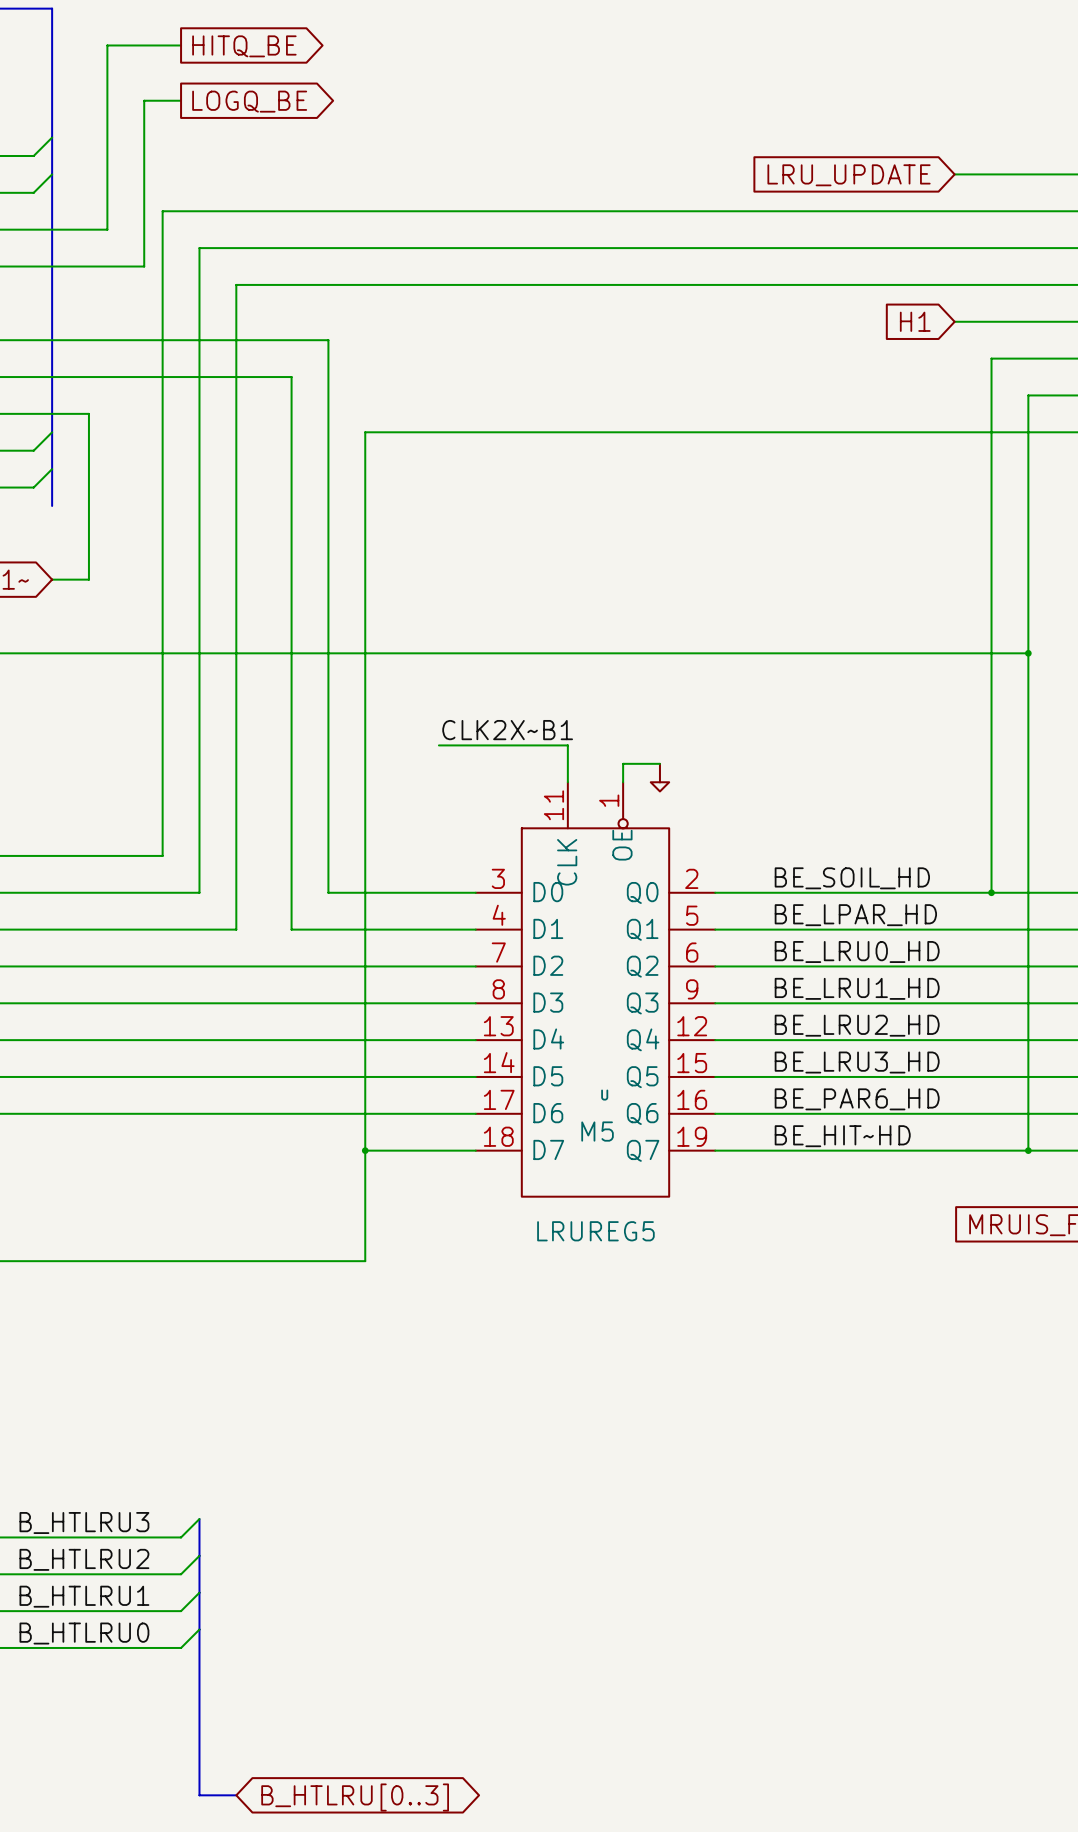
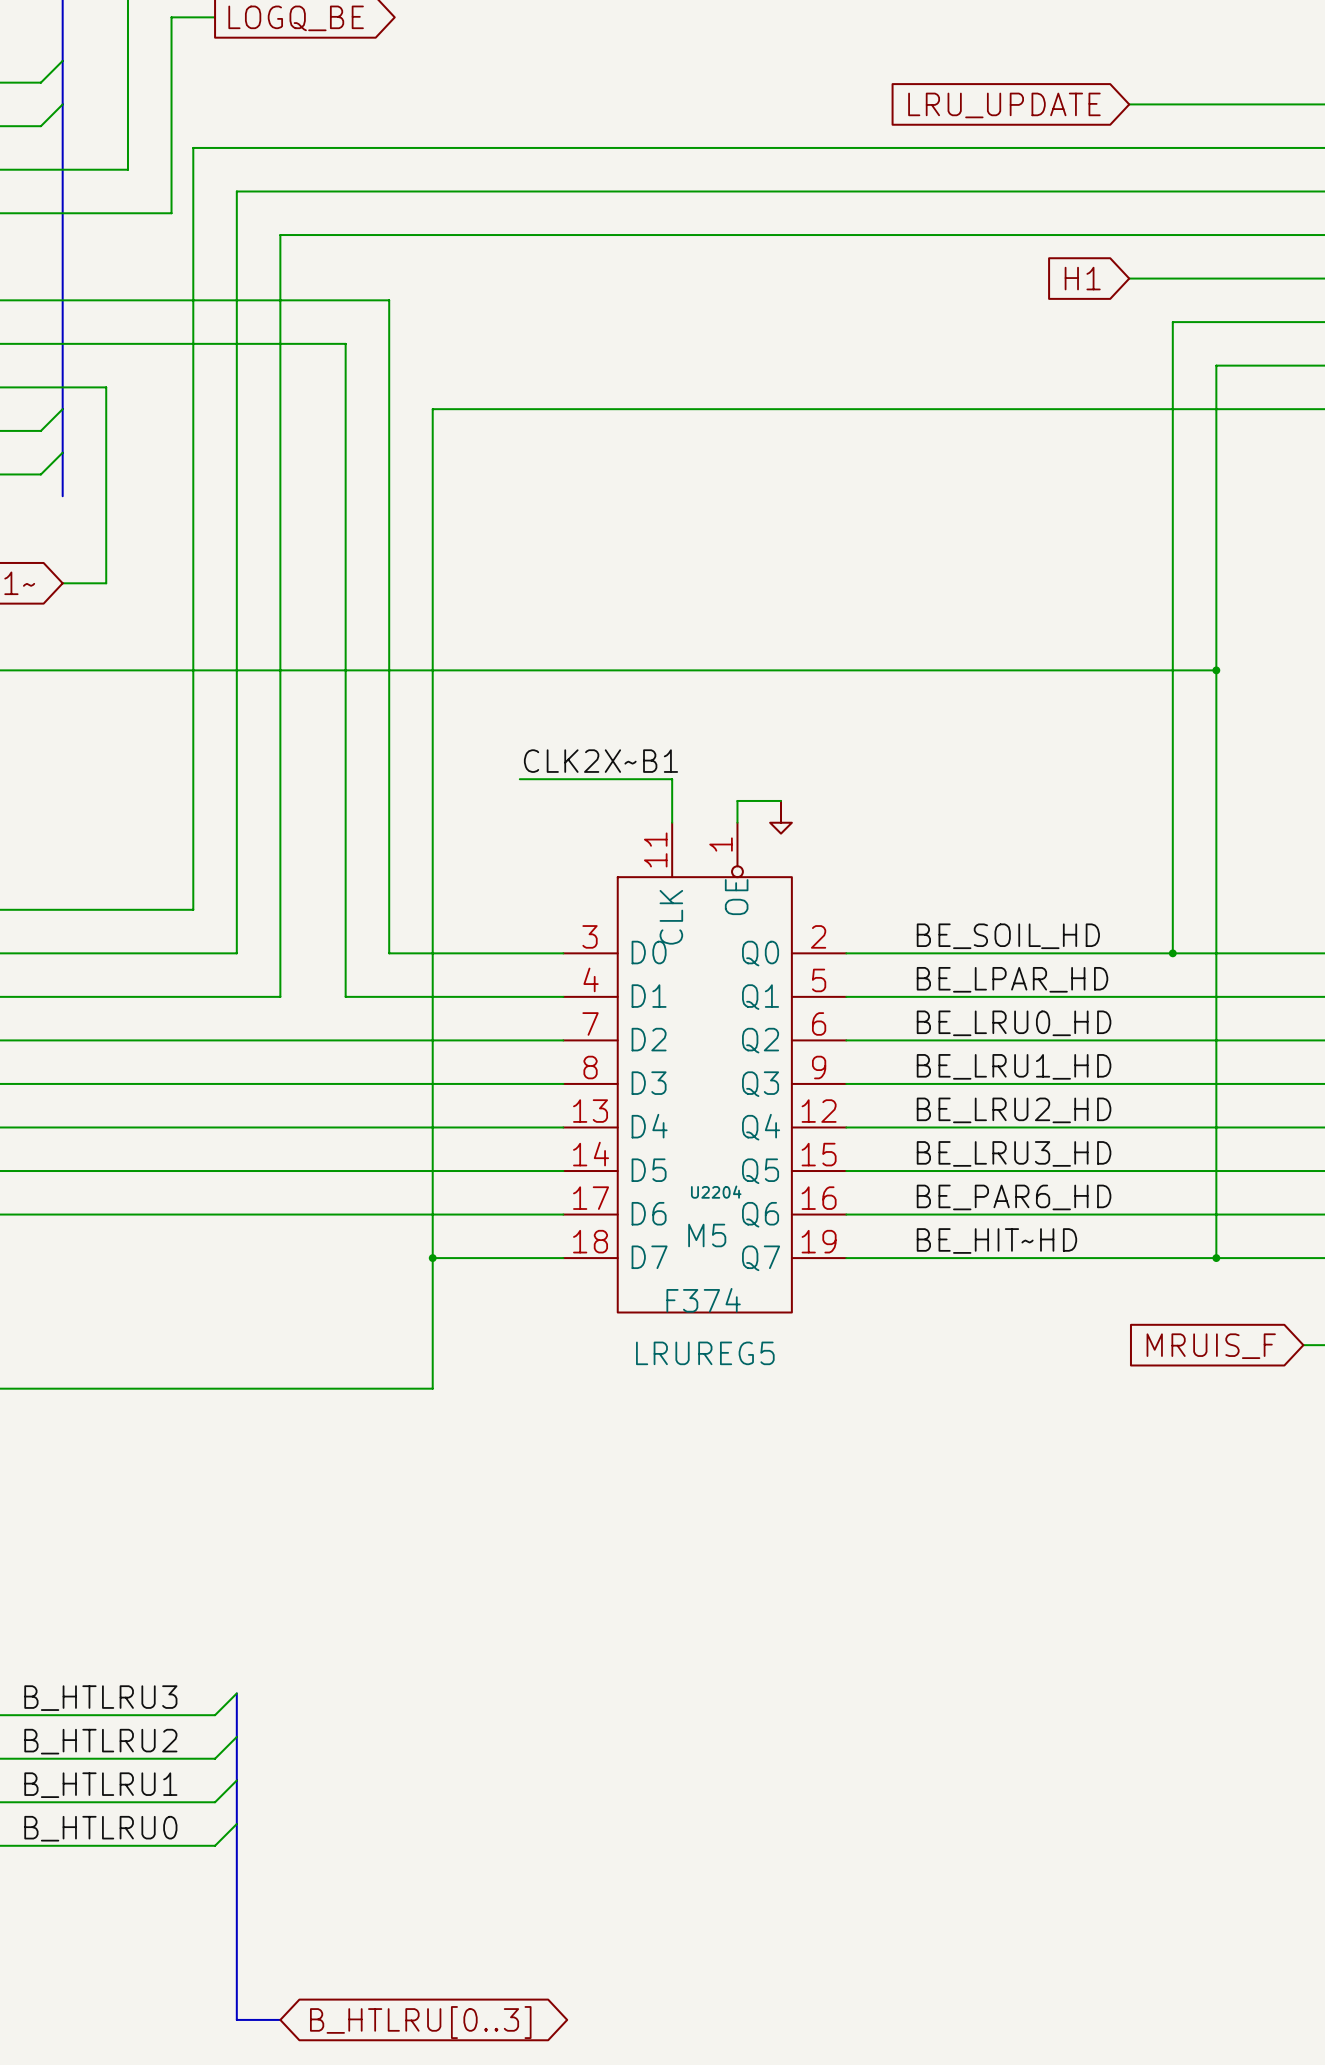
U name: U (604, 1095) -> U2204 (716, 1192)
U value: none -> F374 (703, 1300)

